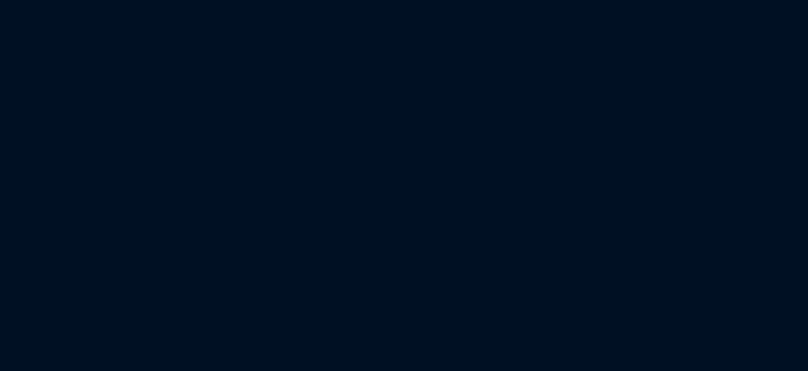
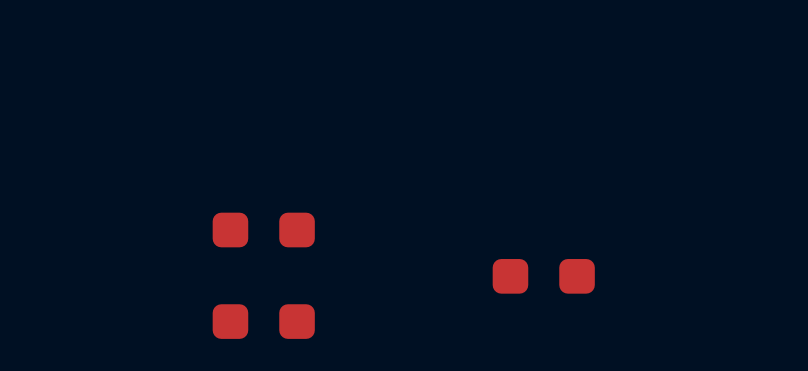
part: none -> (263, 230)
part: none -> (543, 276)
part: none -> (263, 321)

